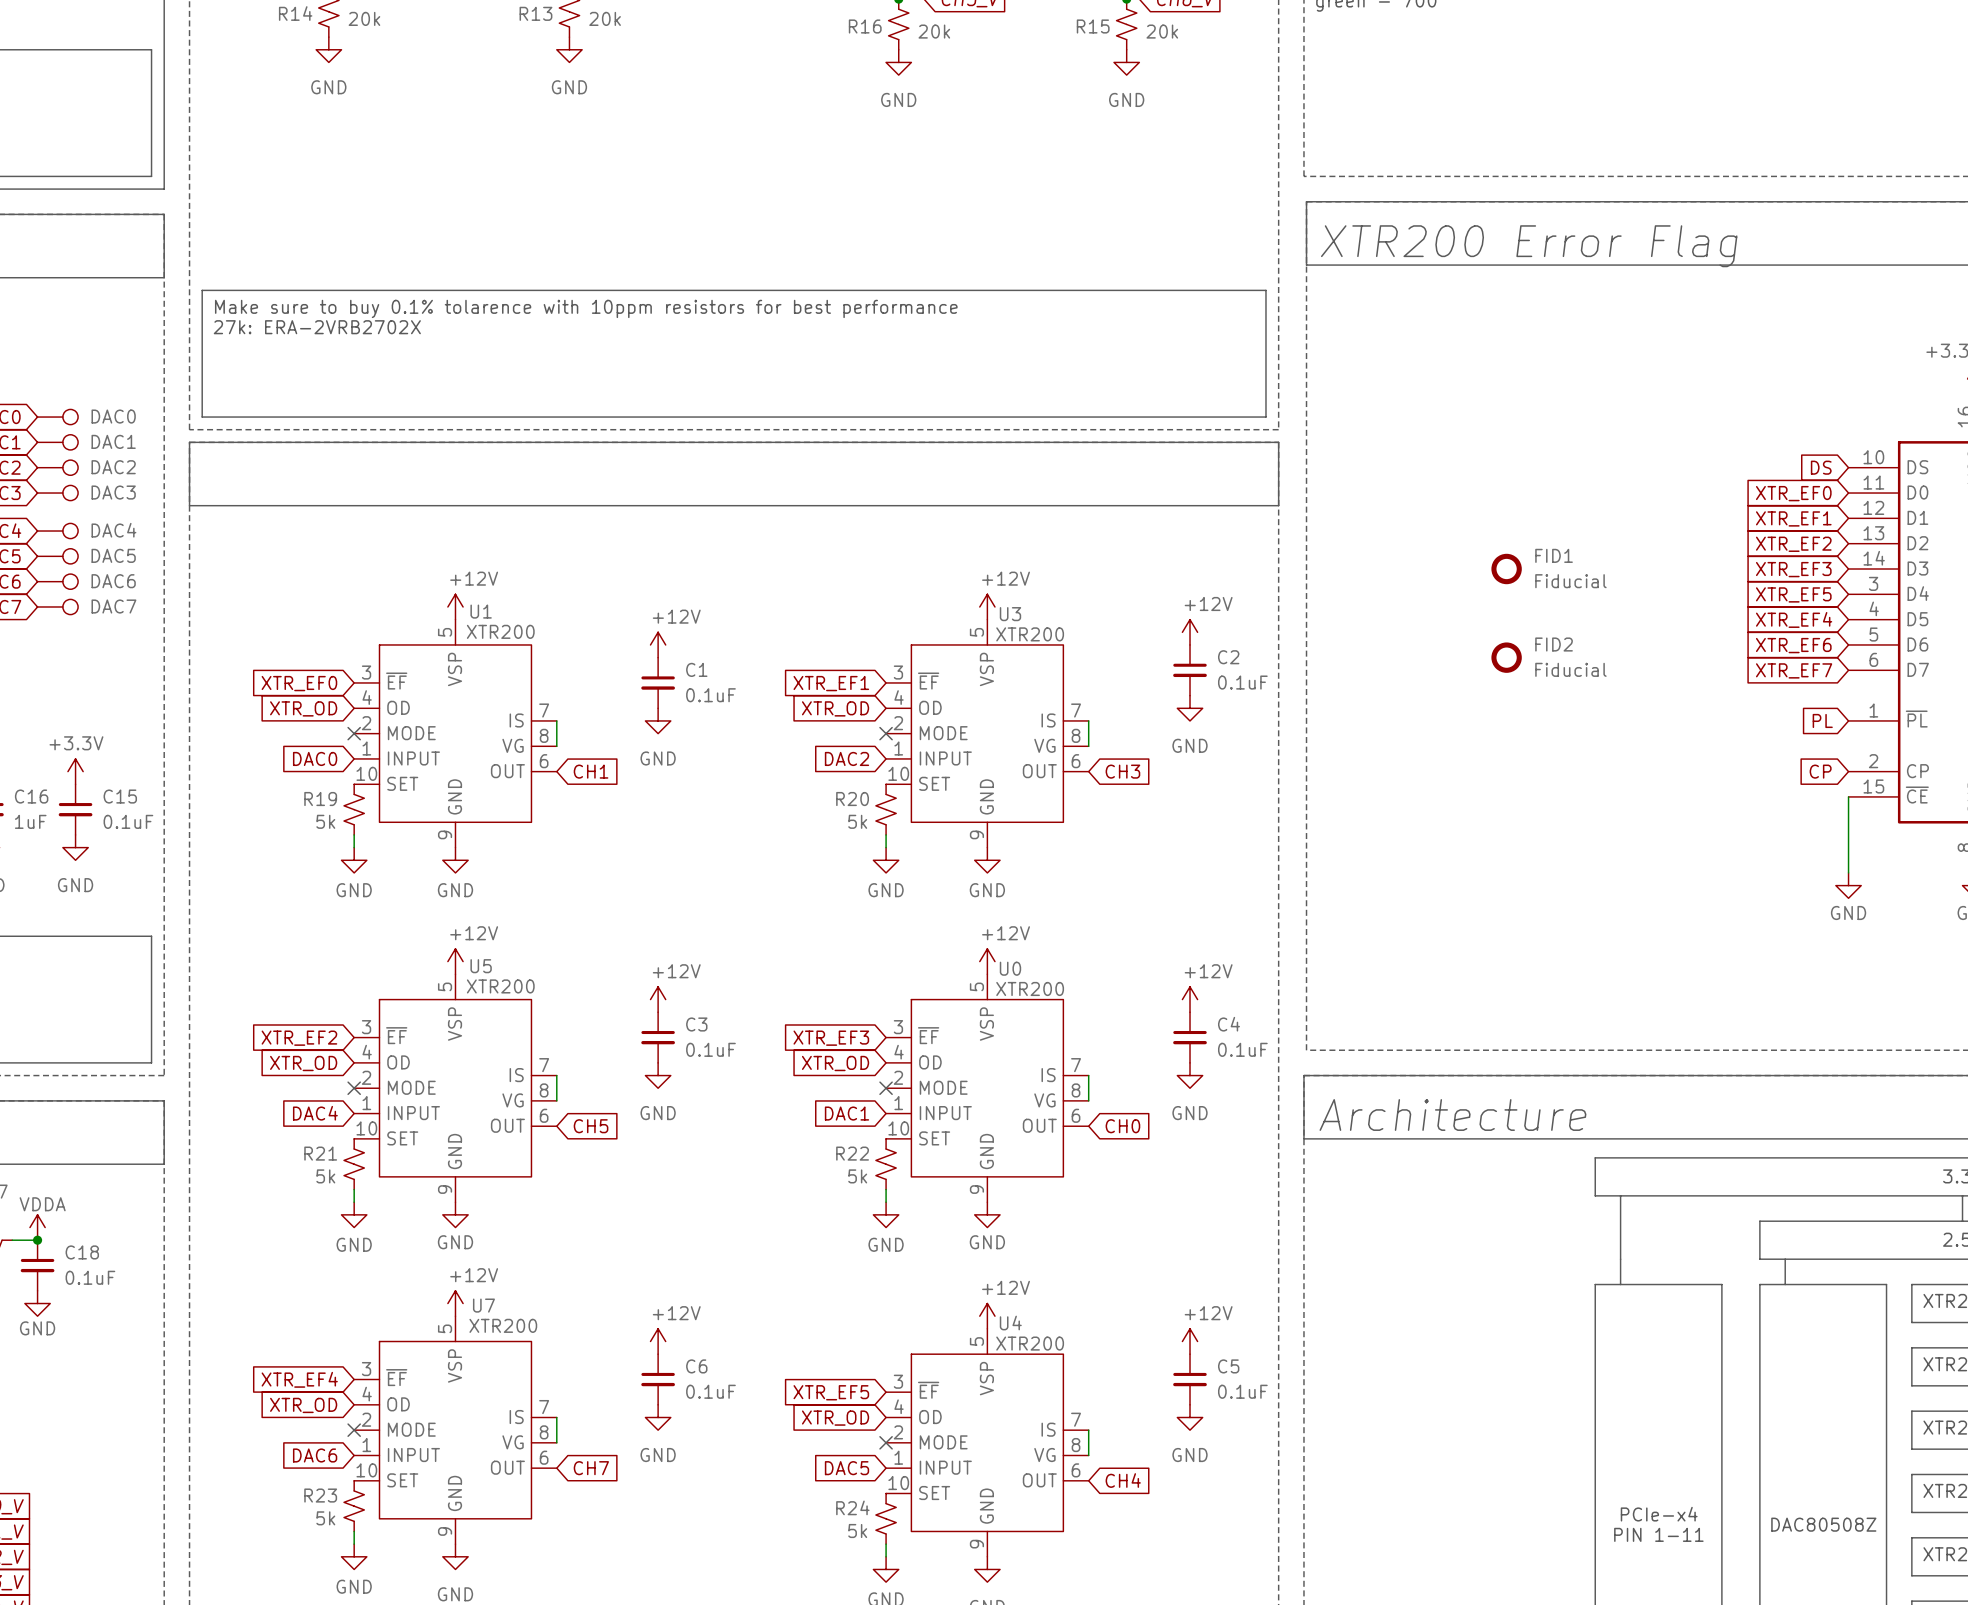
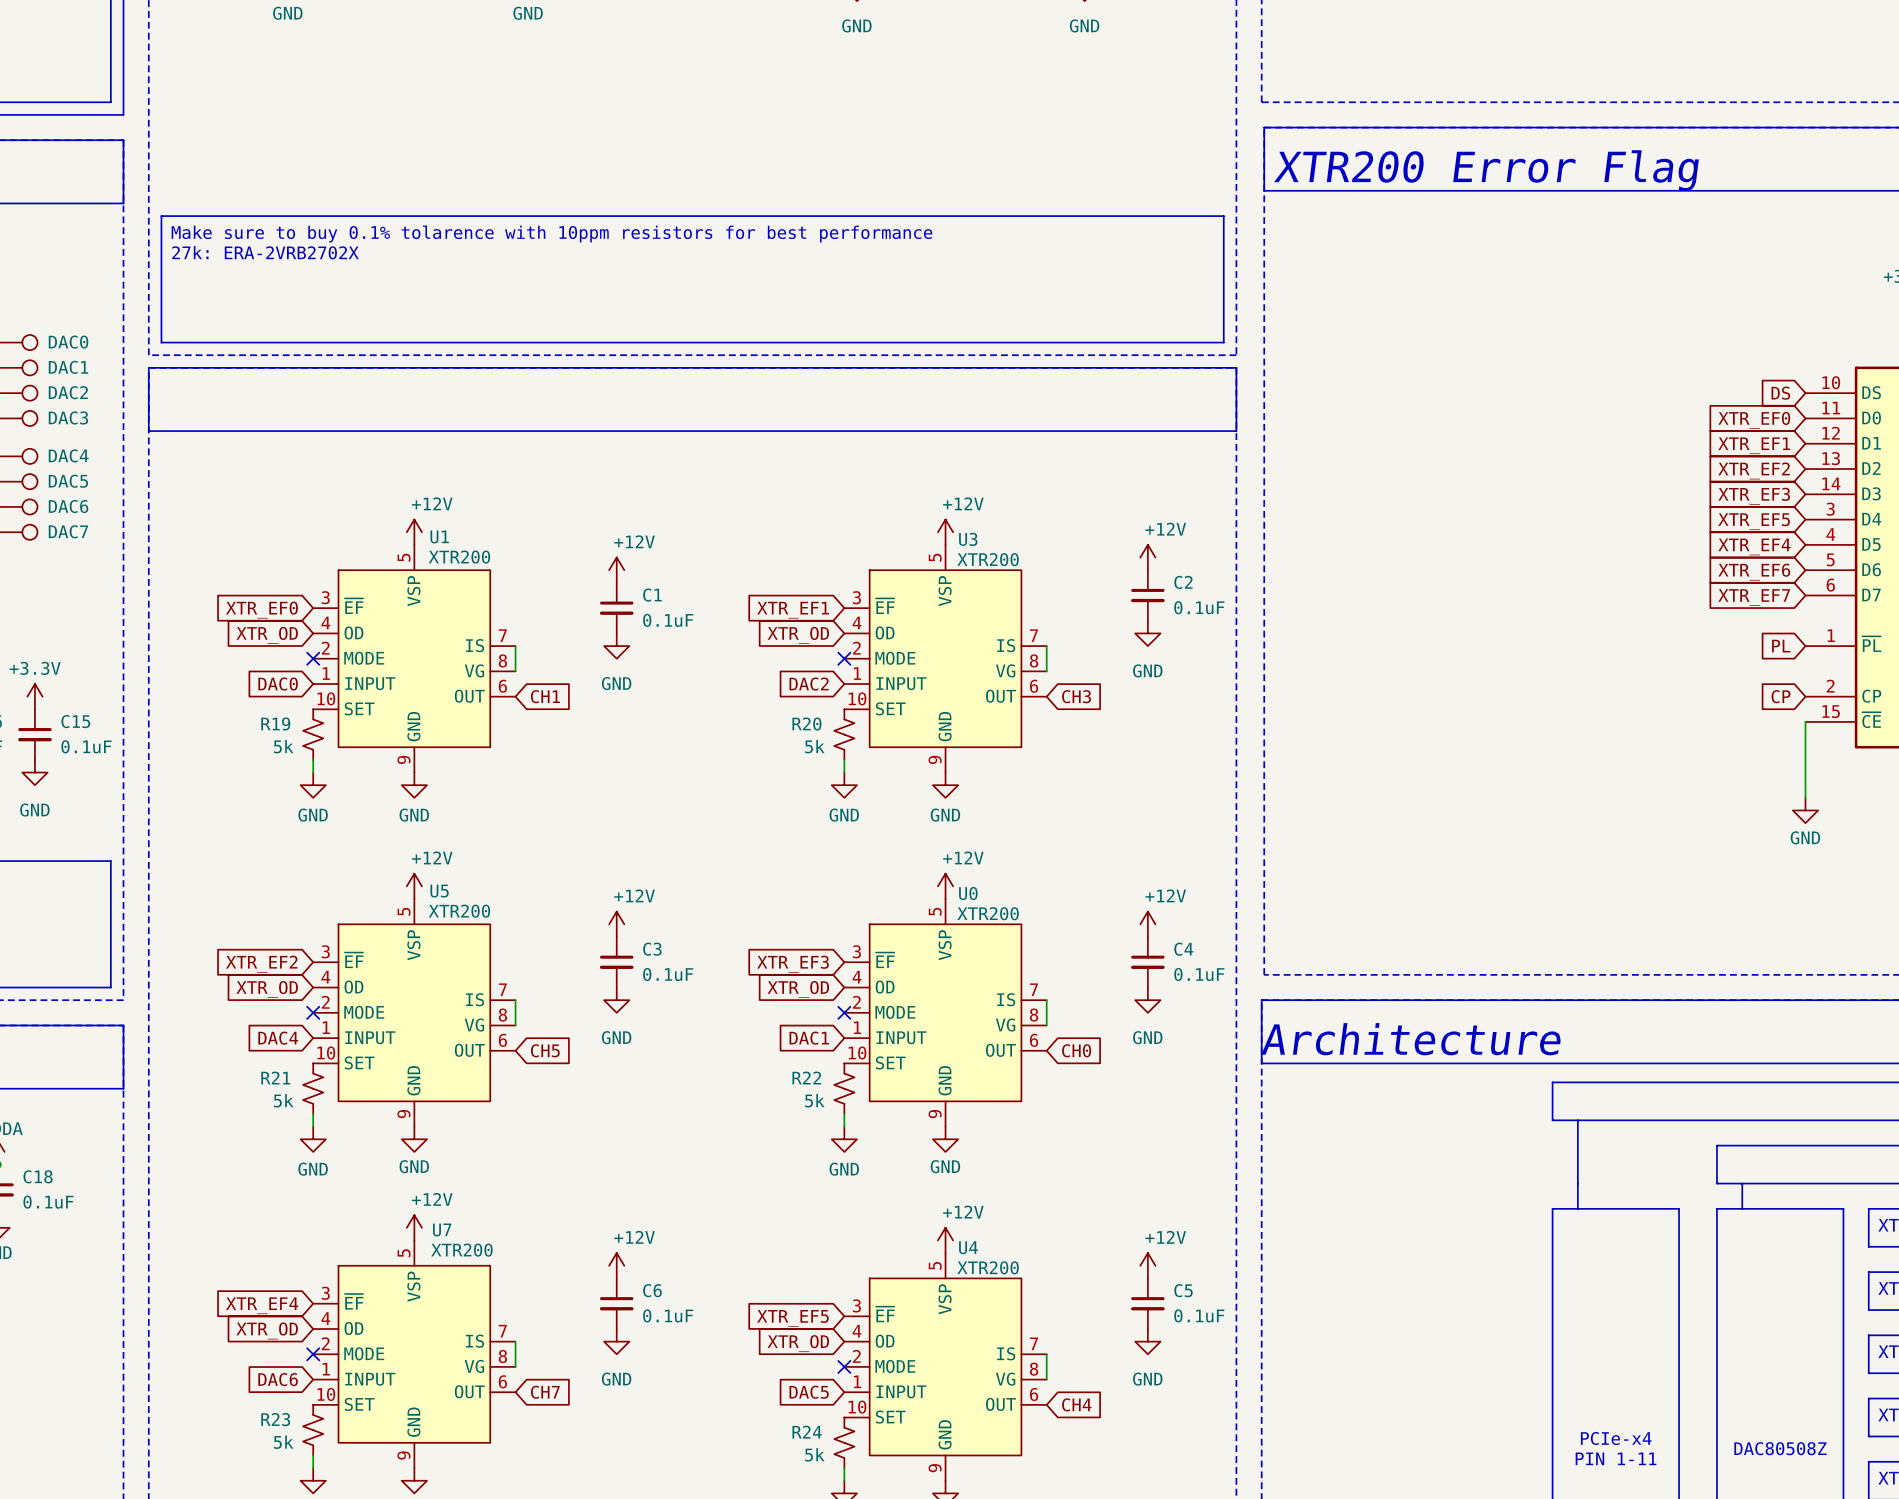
FID1: Fiducial (1506, 569) -> none
FID2: Fiducial (1506, 657) -> none

